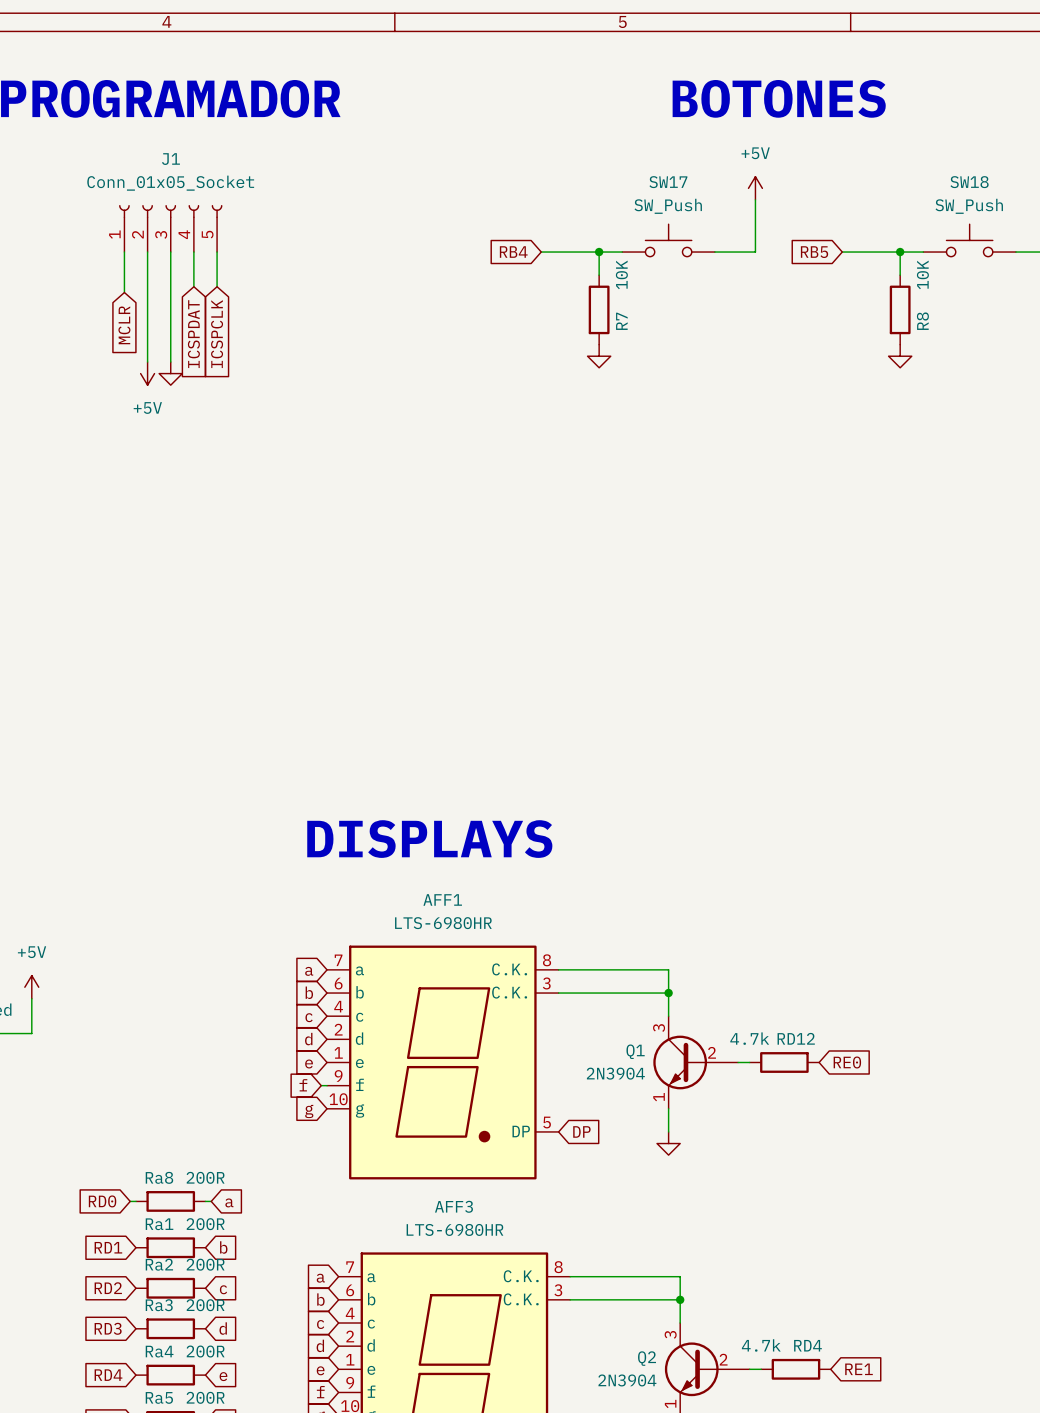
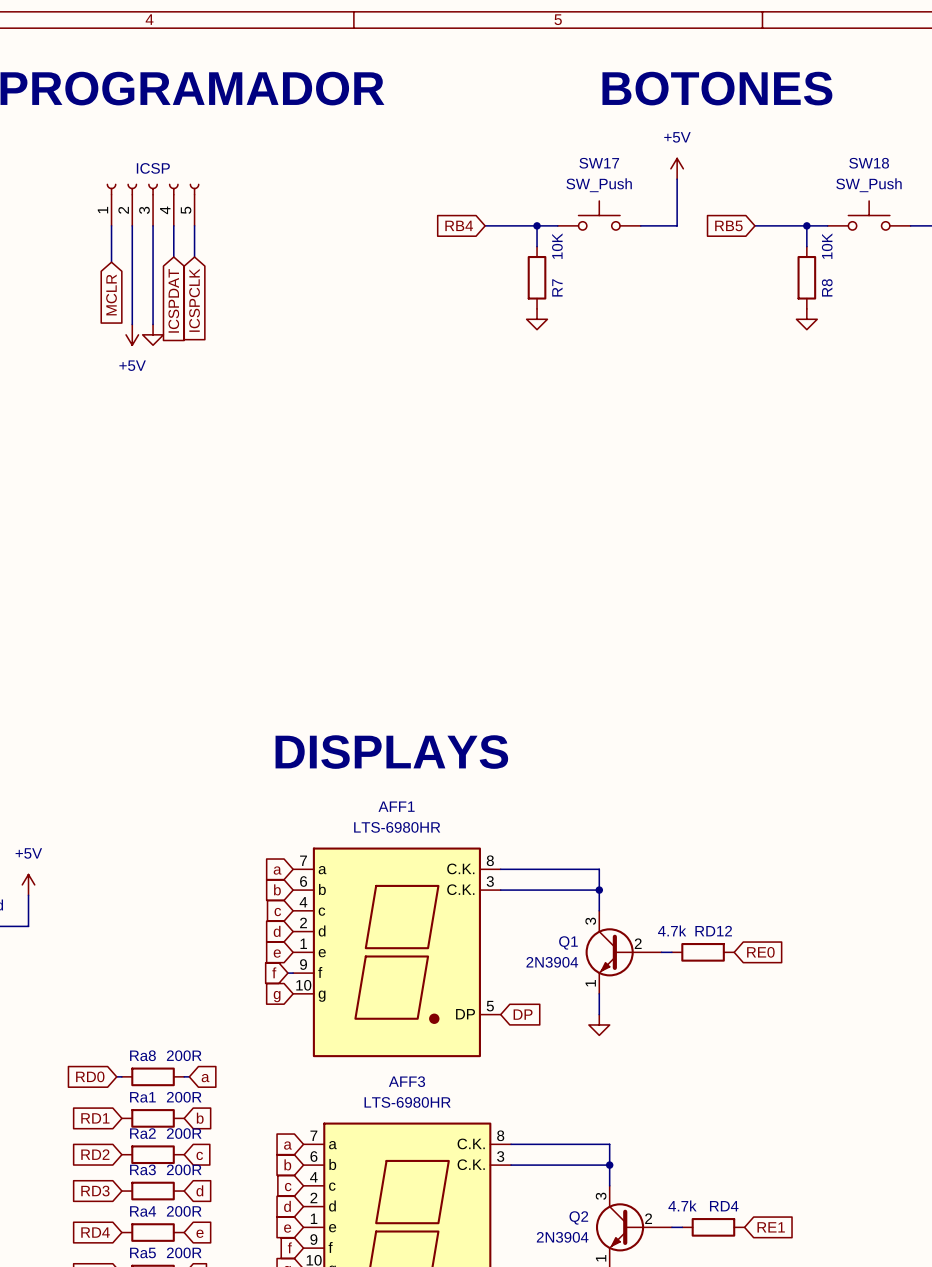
J1 name: J1 (170, 159) -> ICSP (153, 168)
J1 value: Conn_01x05_Socket (170, 183) -> none

